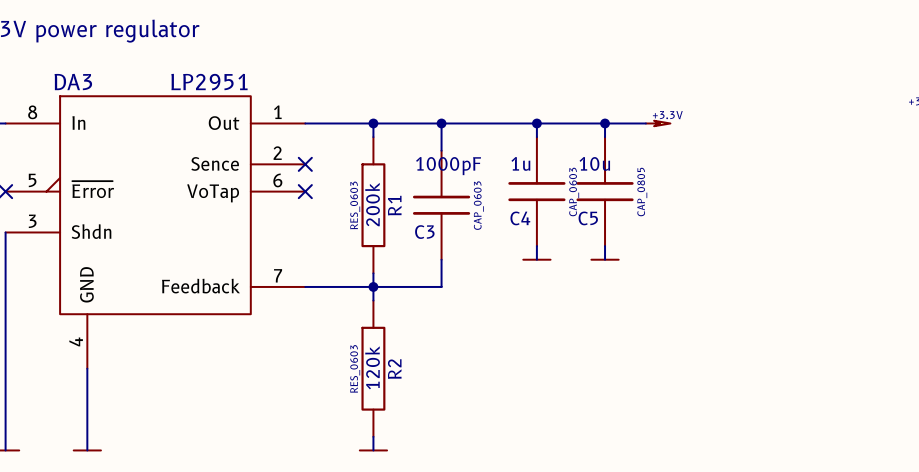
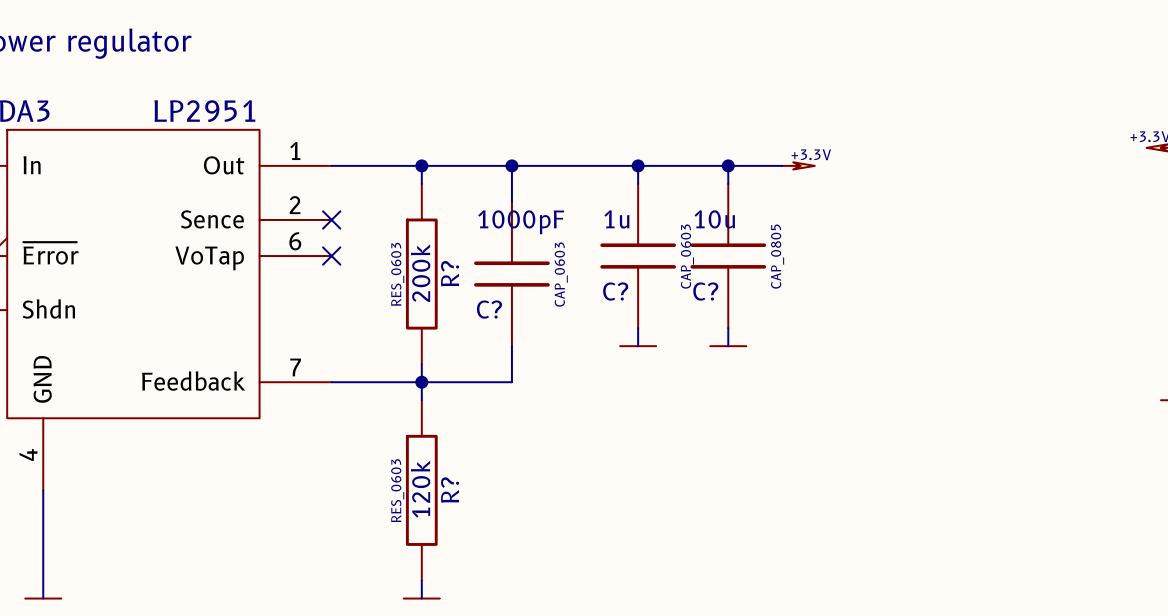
R1 name: R1 (394, 205) -> R? (450, 273)
C4 name: C4 (520, 218) -> C? (615, 291)
C5 name: C5 (588, 218) -> C? (705, 291)
C3 name: C3 (424, 232) -> C? (489, 309)
R2 name: R2 (394, 369) -> R? (450, 490)

